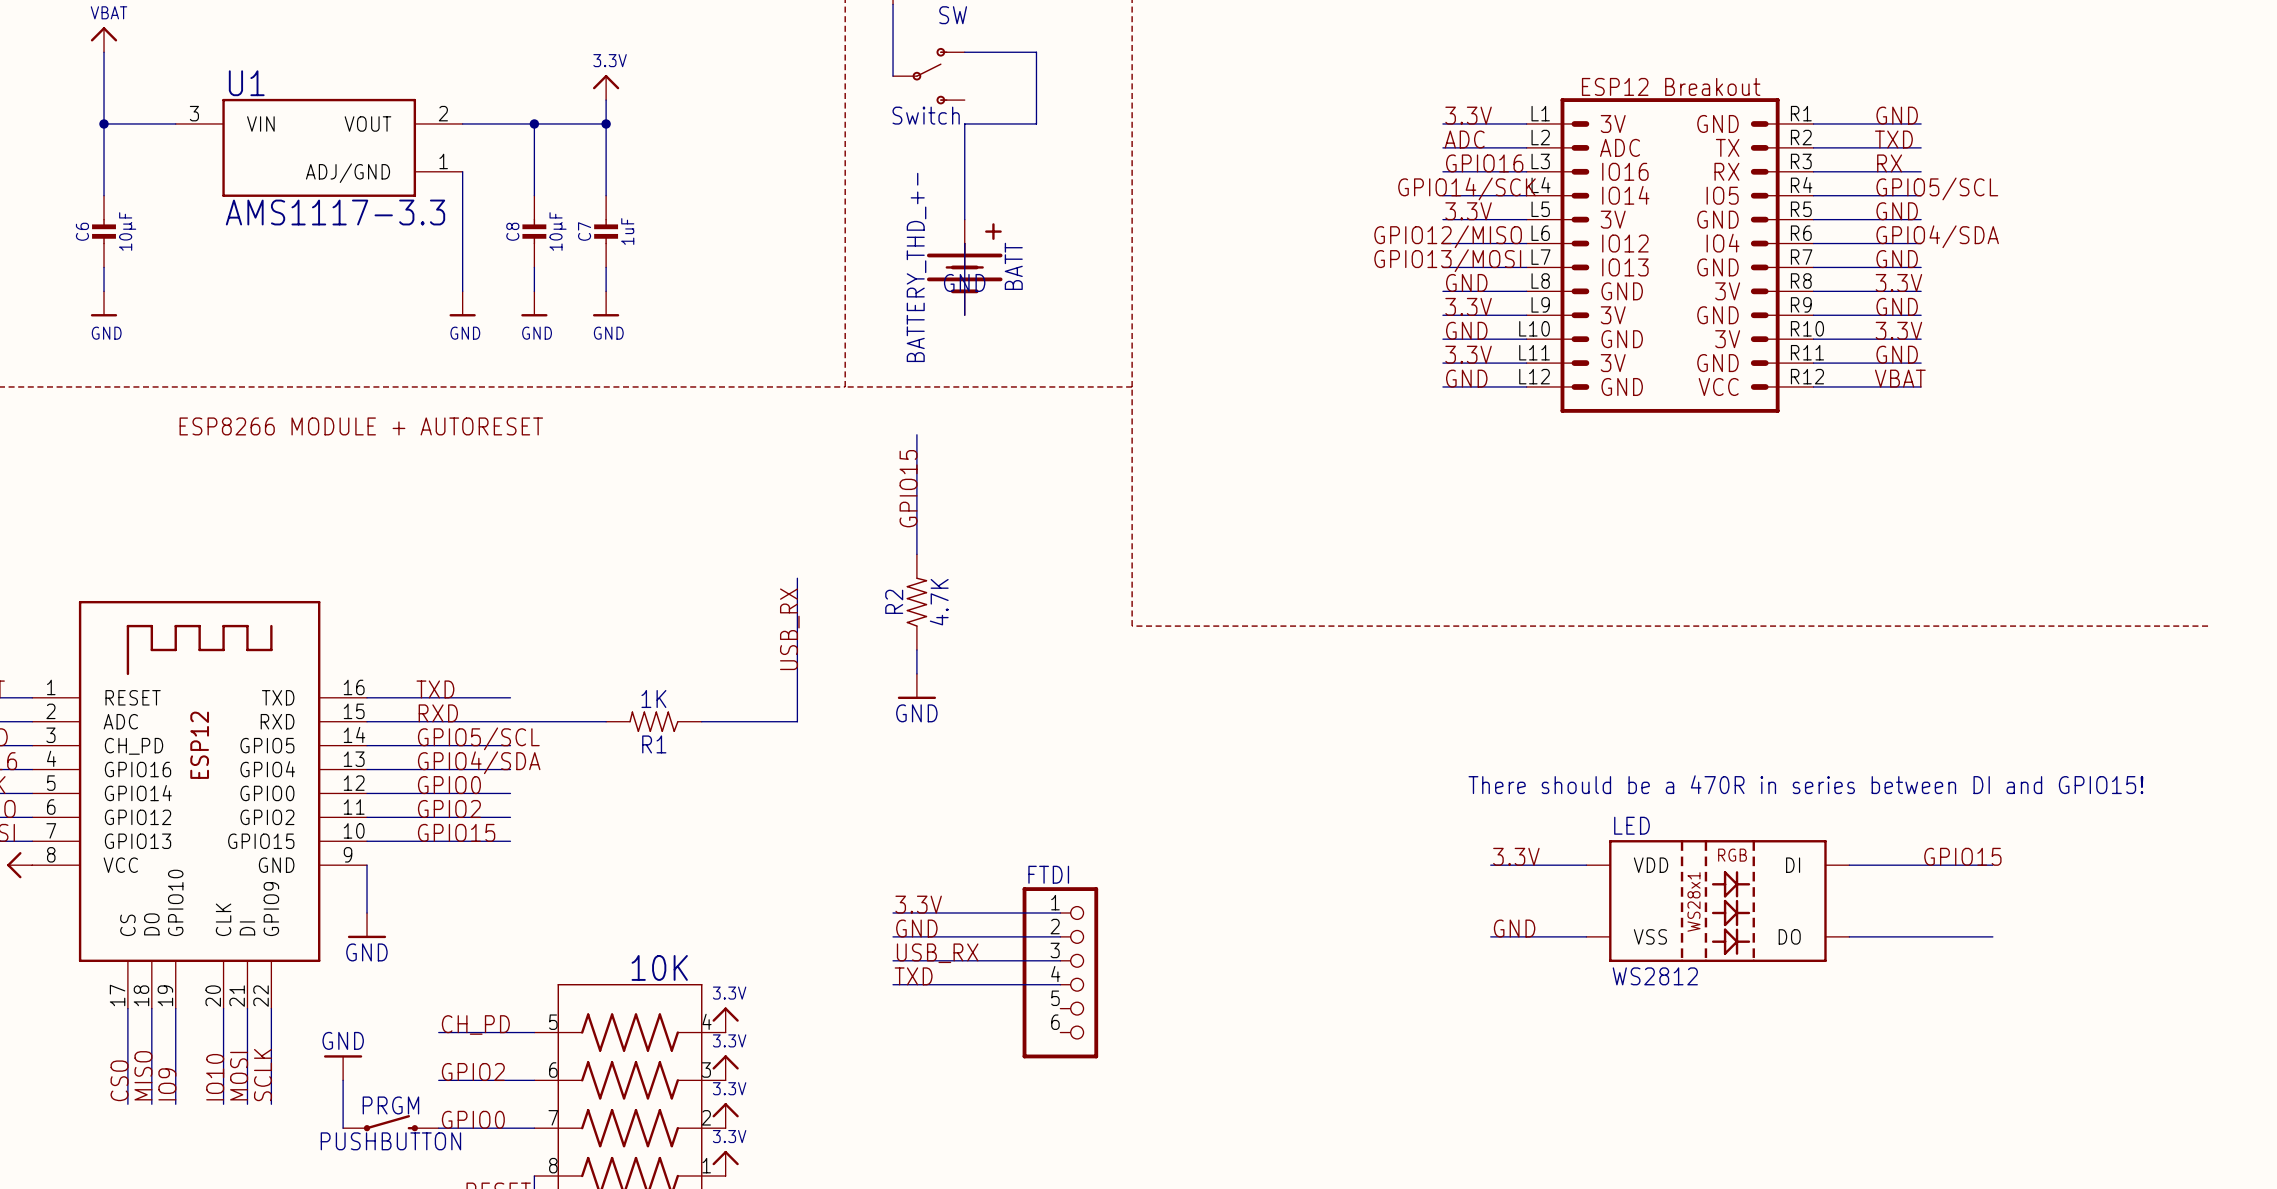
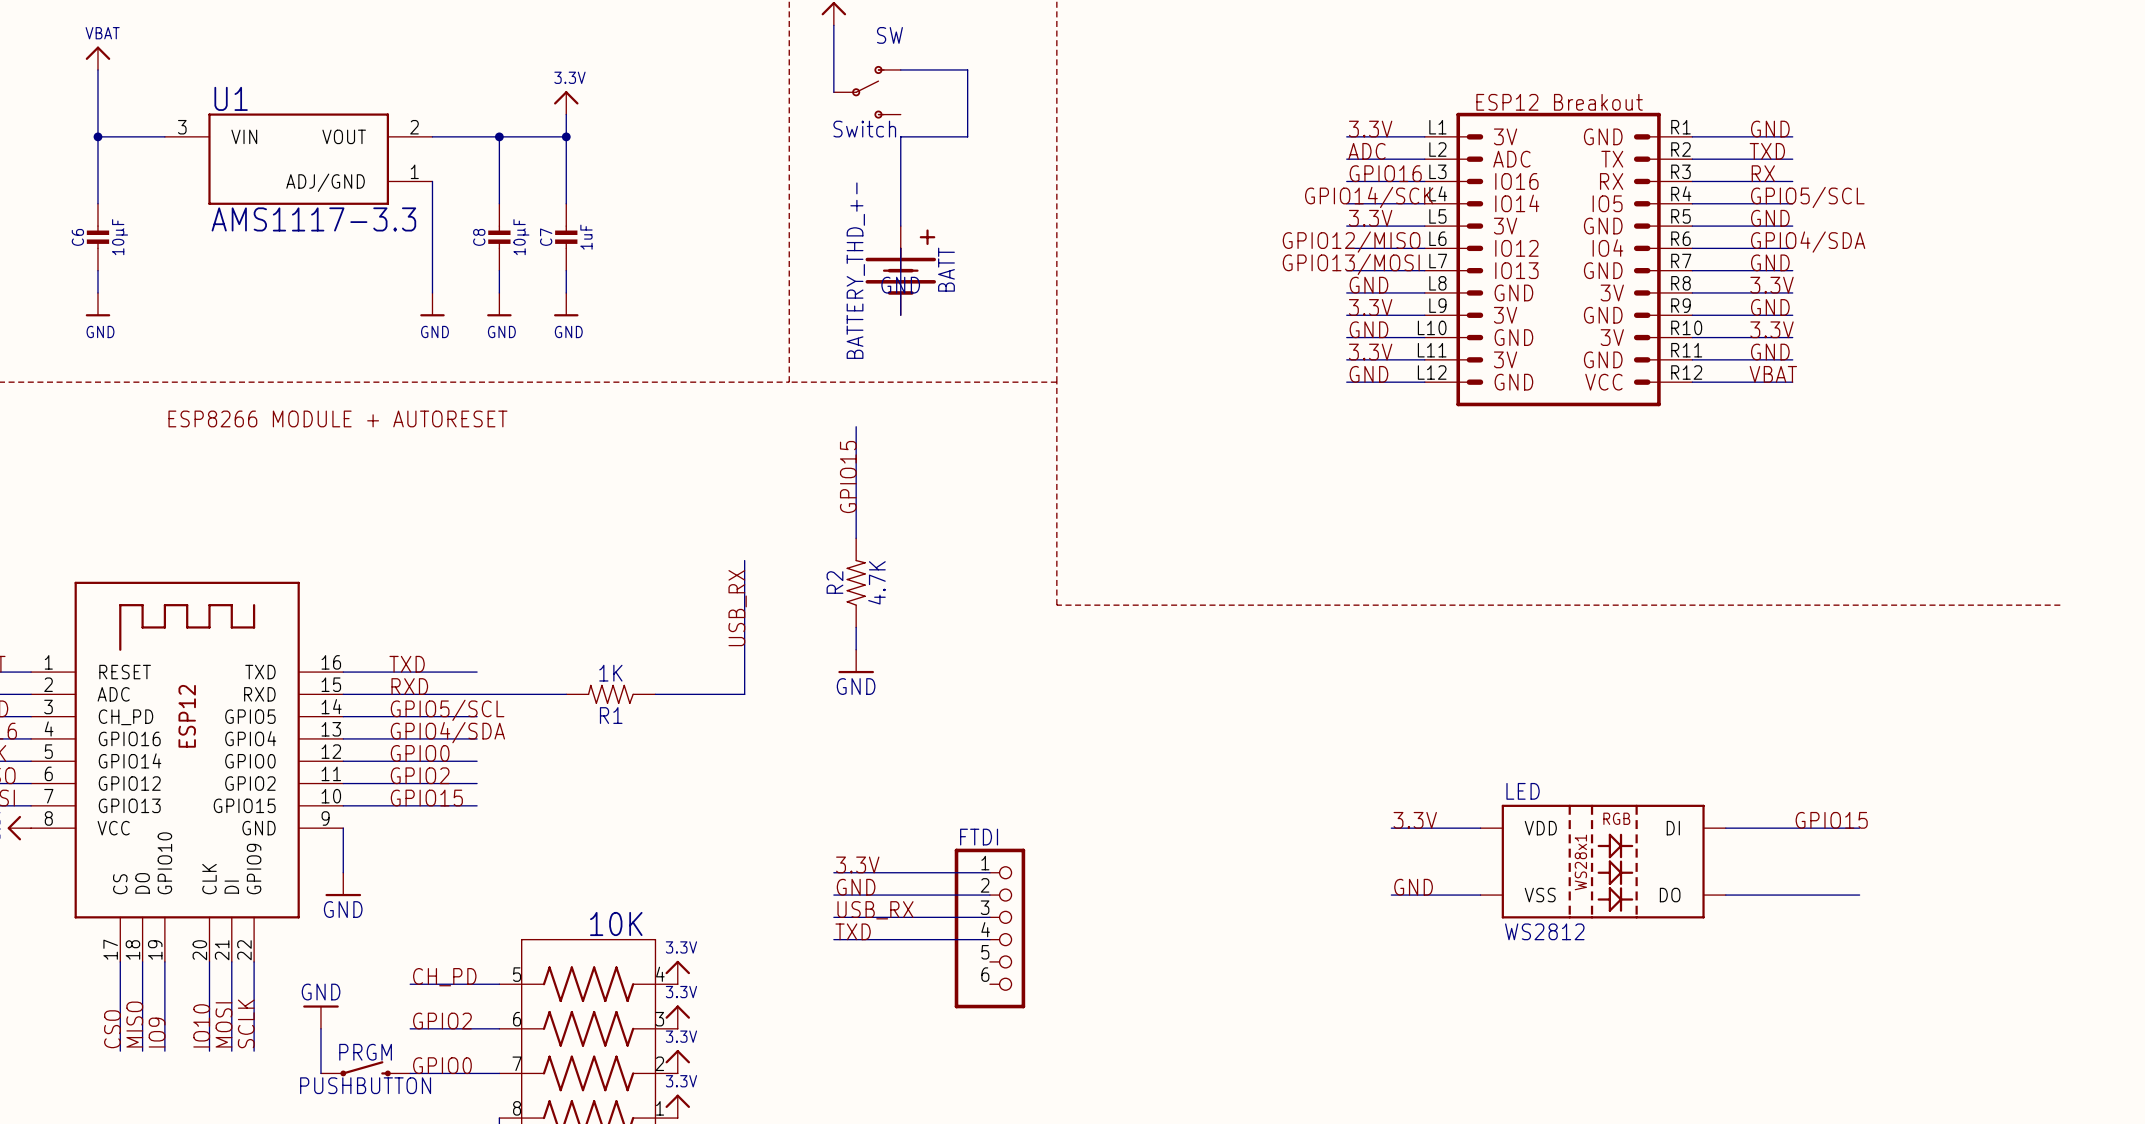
text: There should be a 470R in series between DI and GPIO15! (1805, 784) -> none

